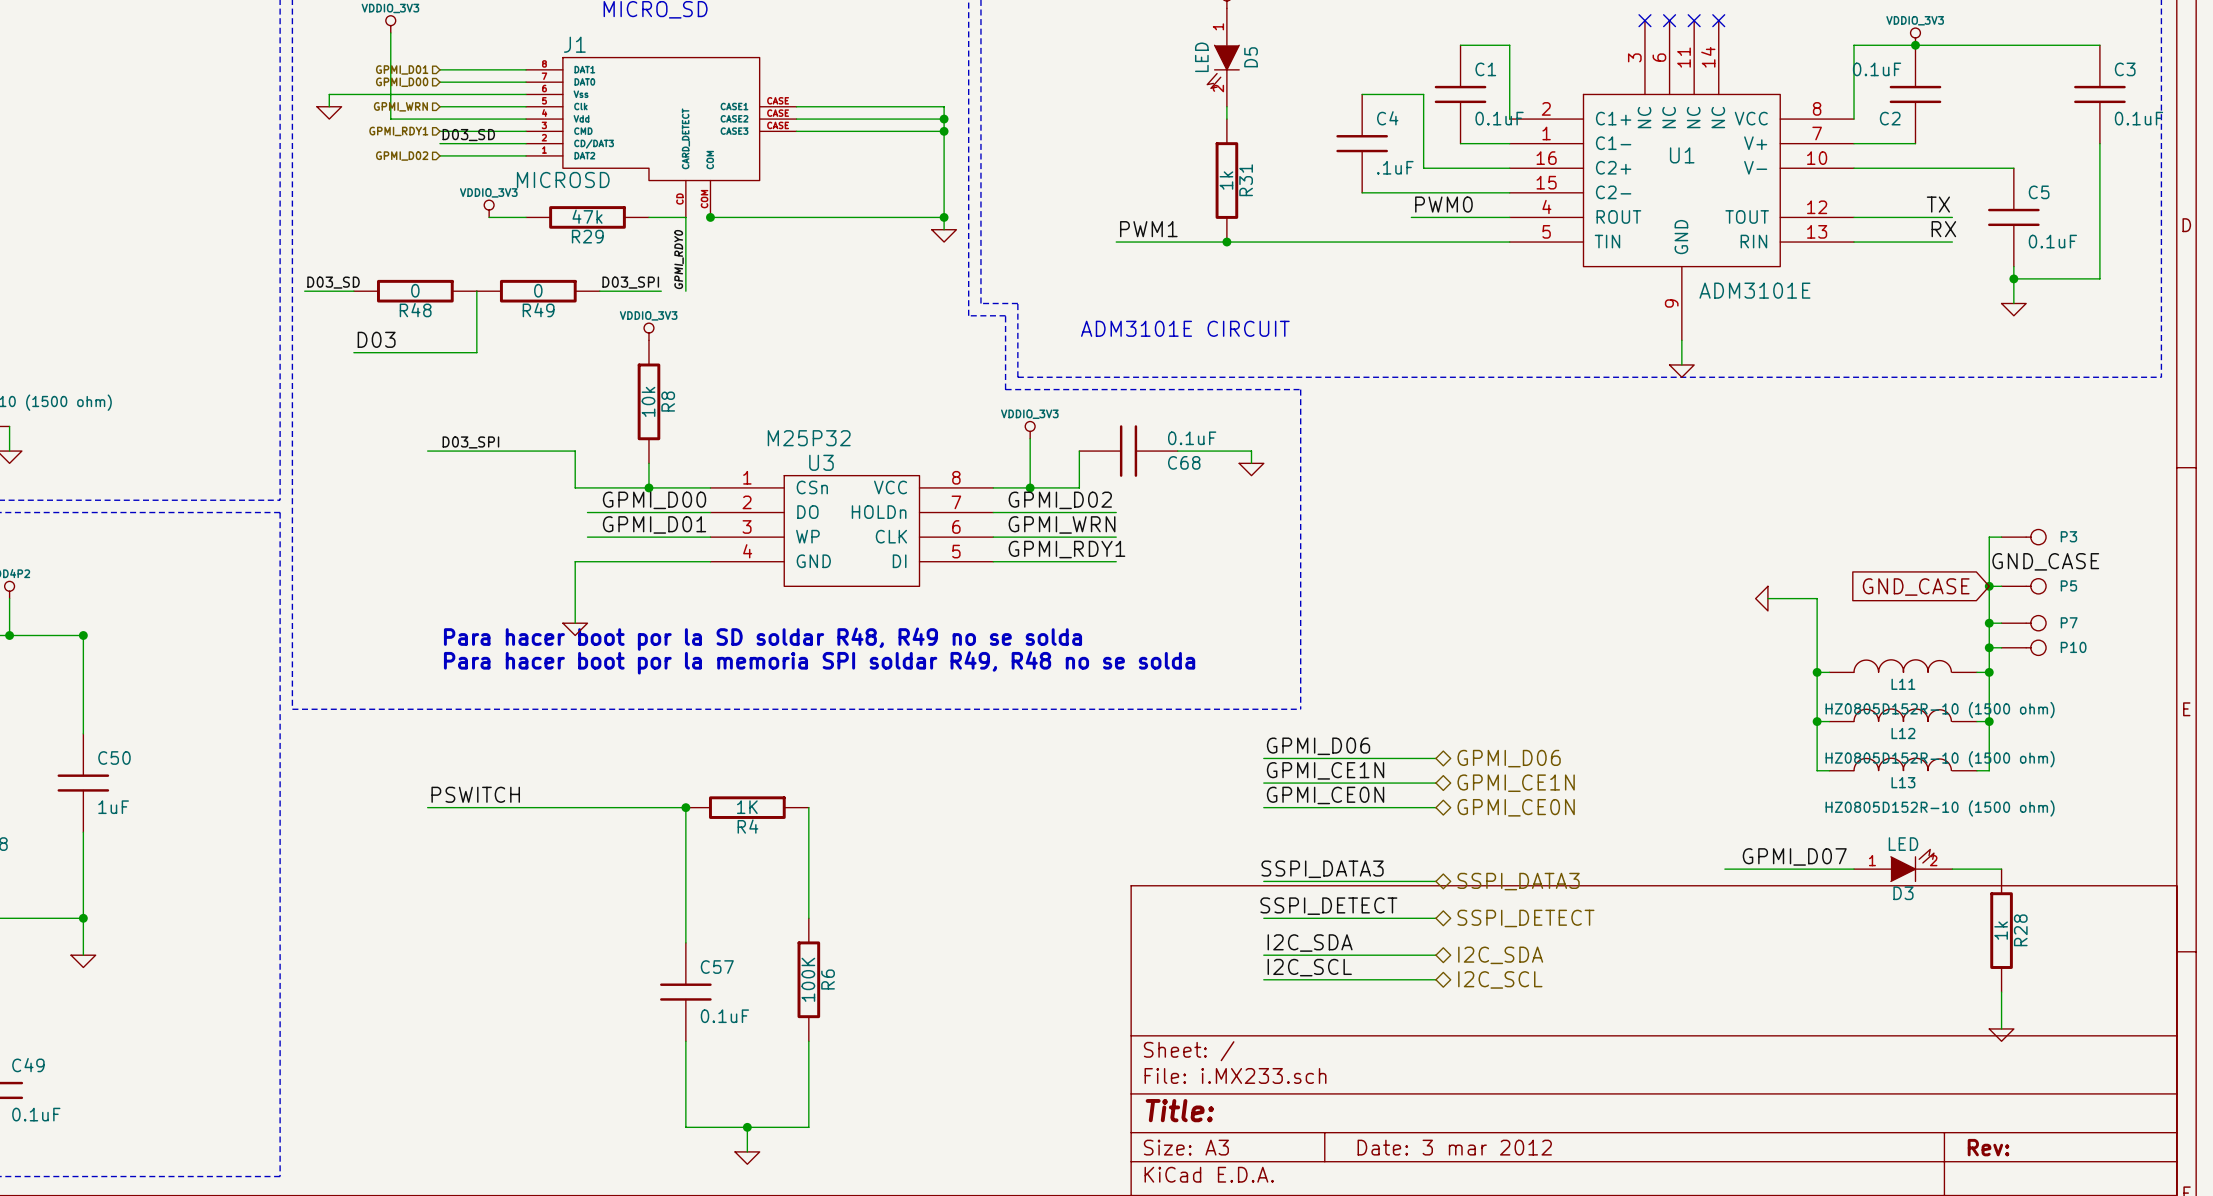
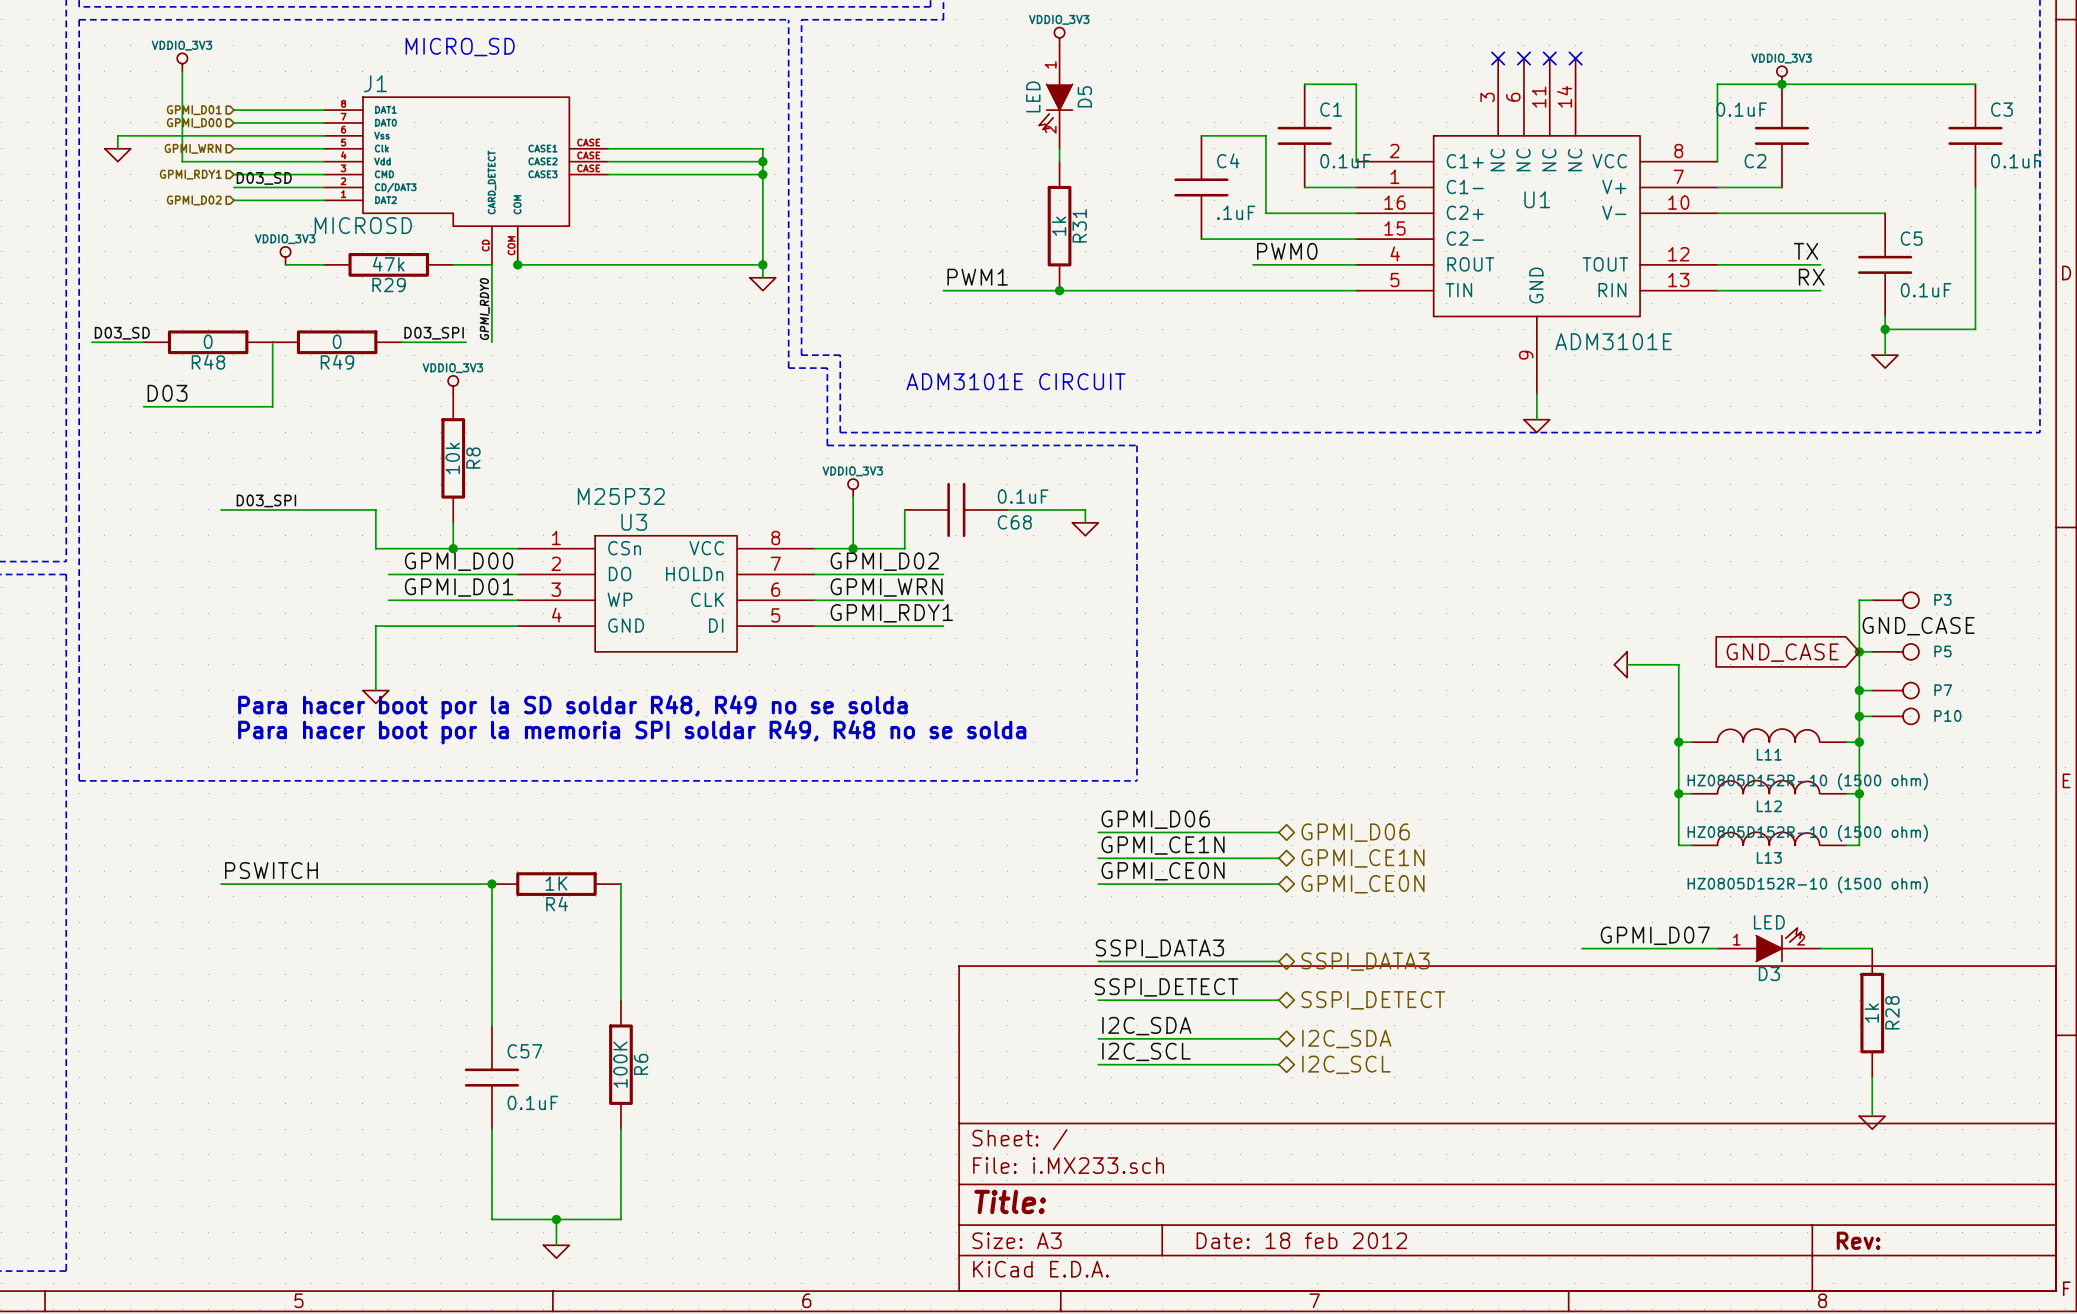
title block: Date: 3 mar 2012 (1454, 1147) -> Date: 18 feb 2012 (1301, 1240)

